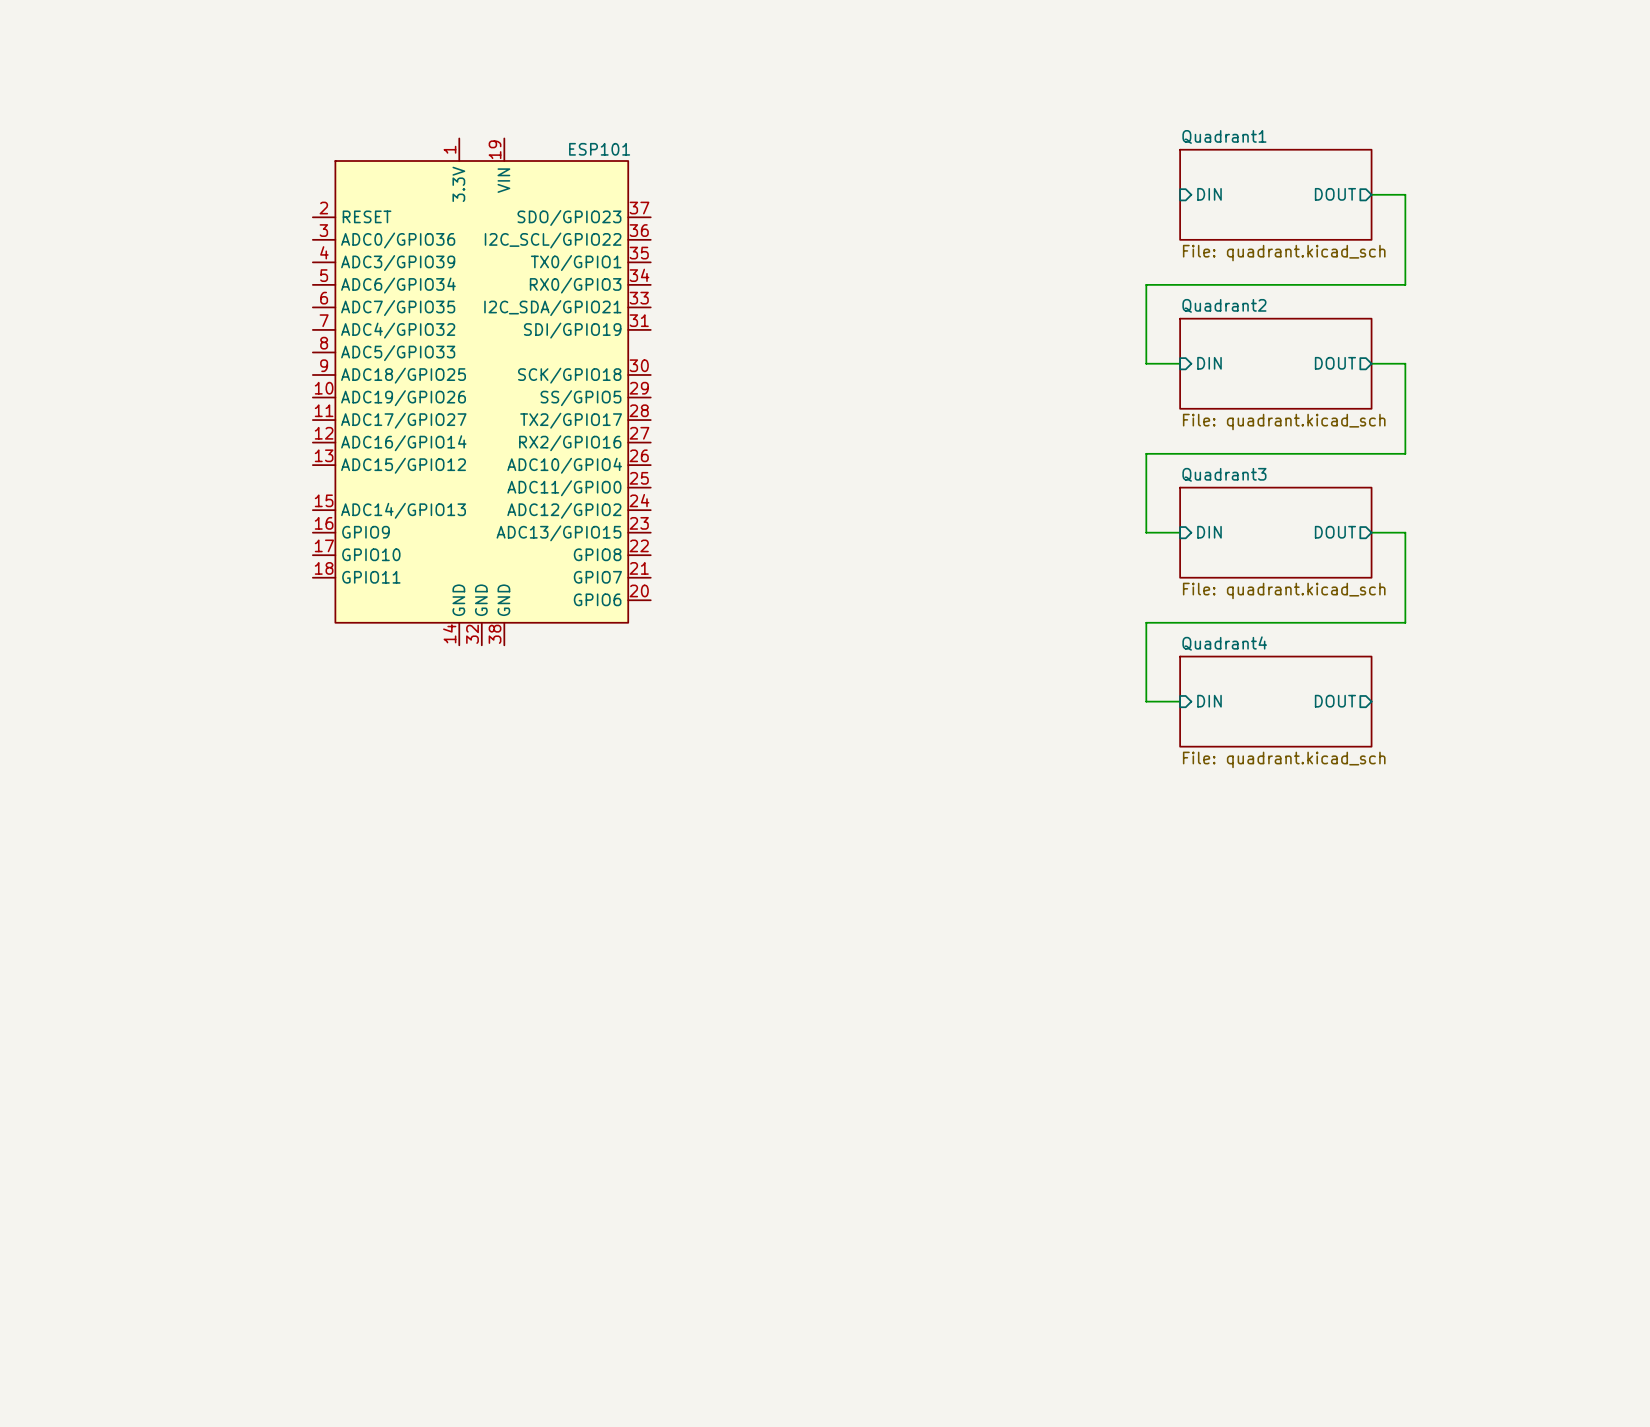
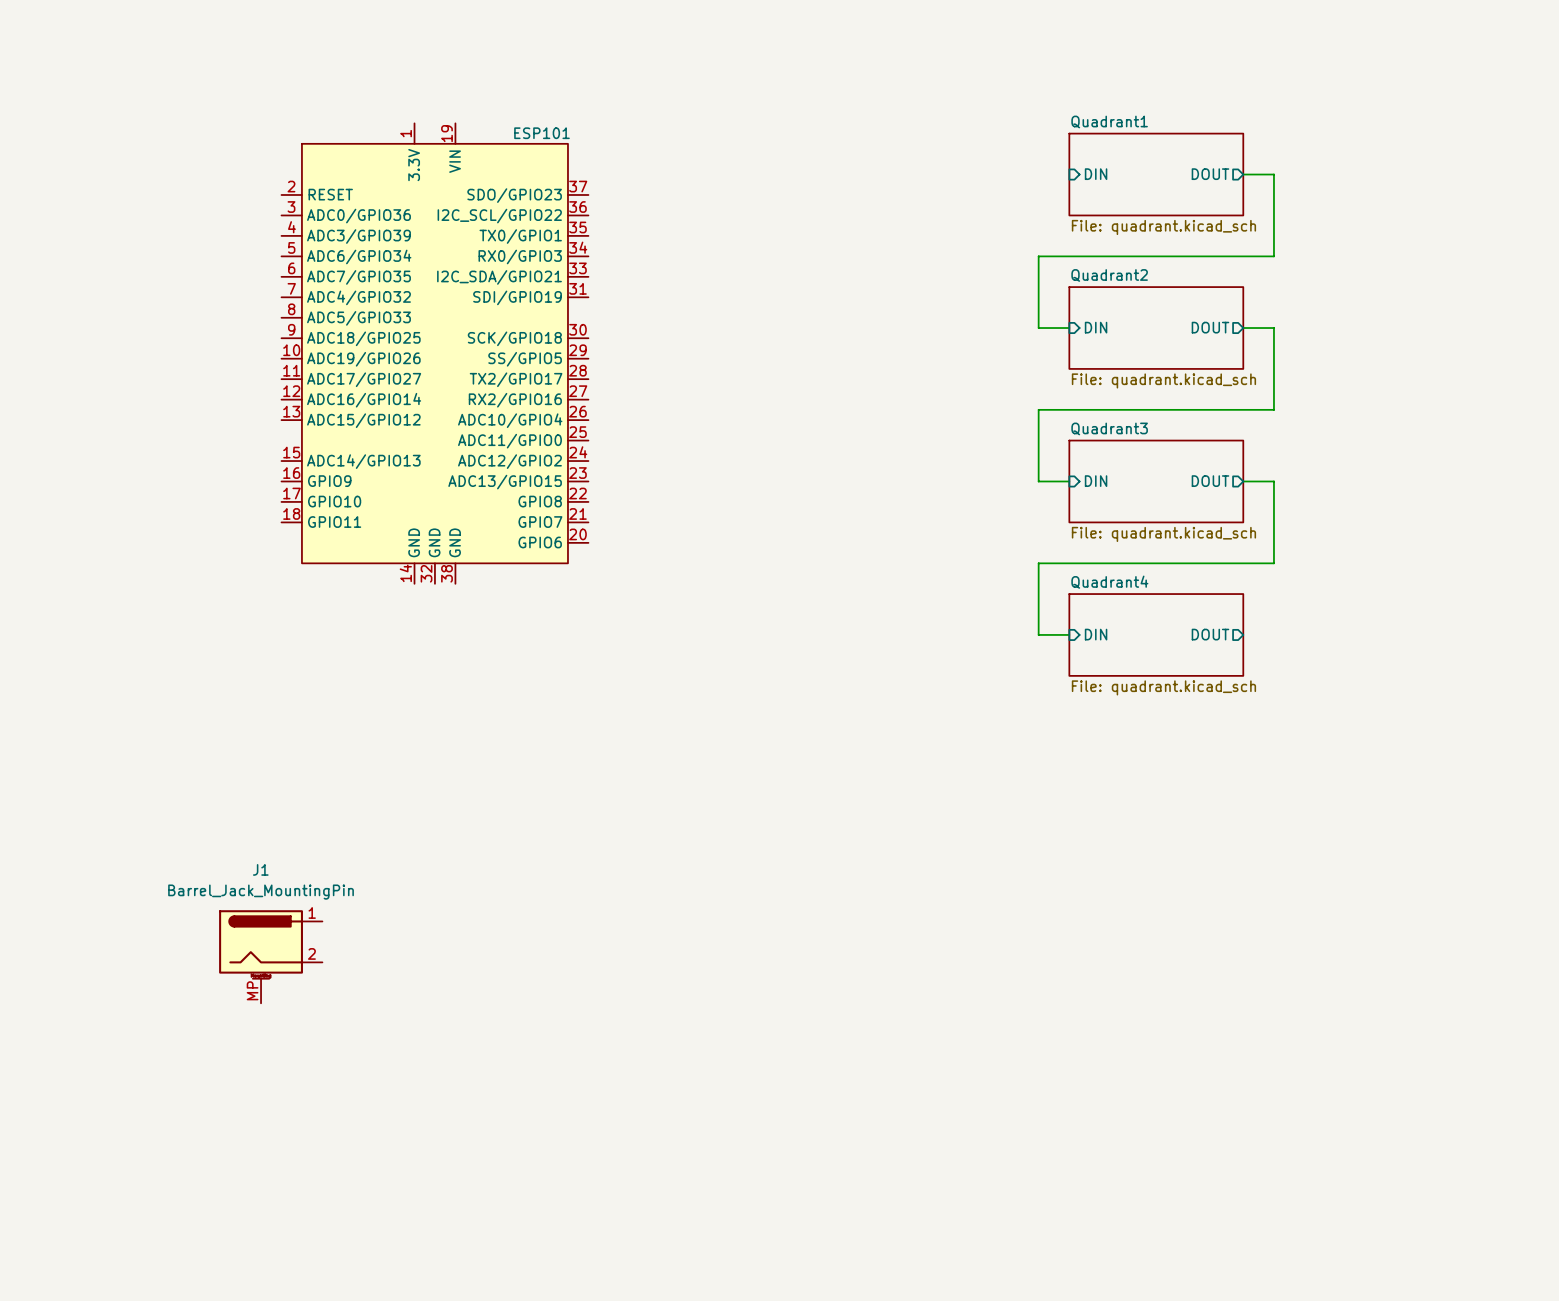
J1: none -> Barrel_Jack_MountingPin (270, 956)

